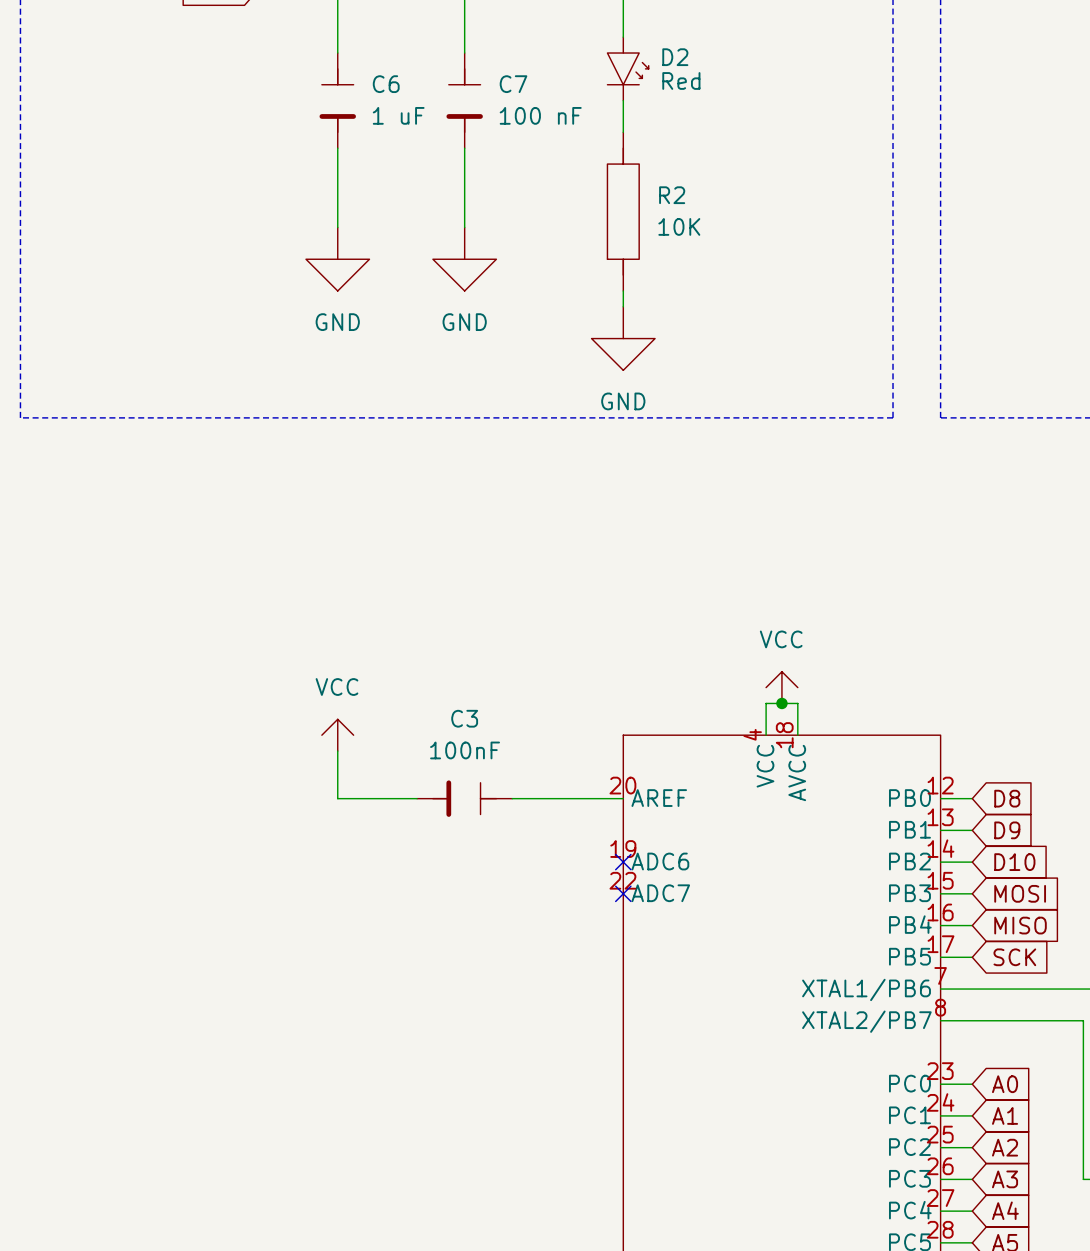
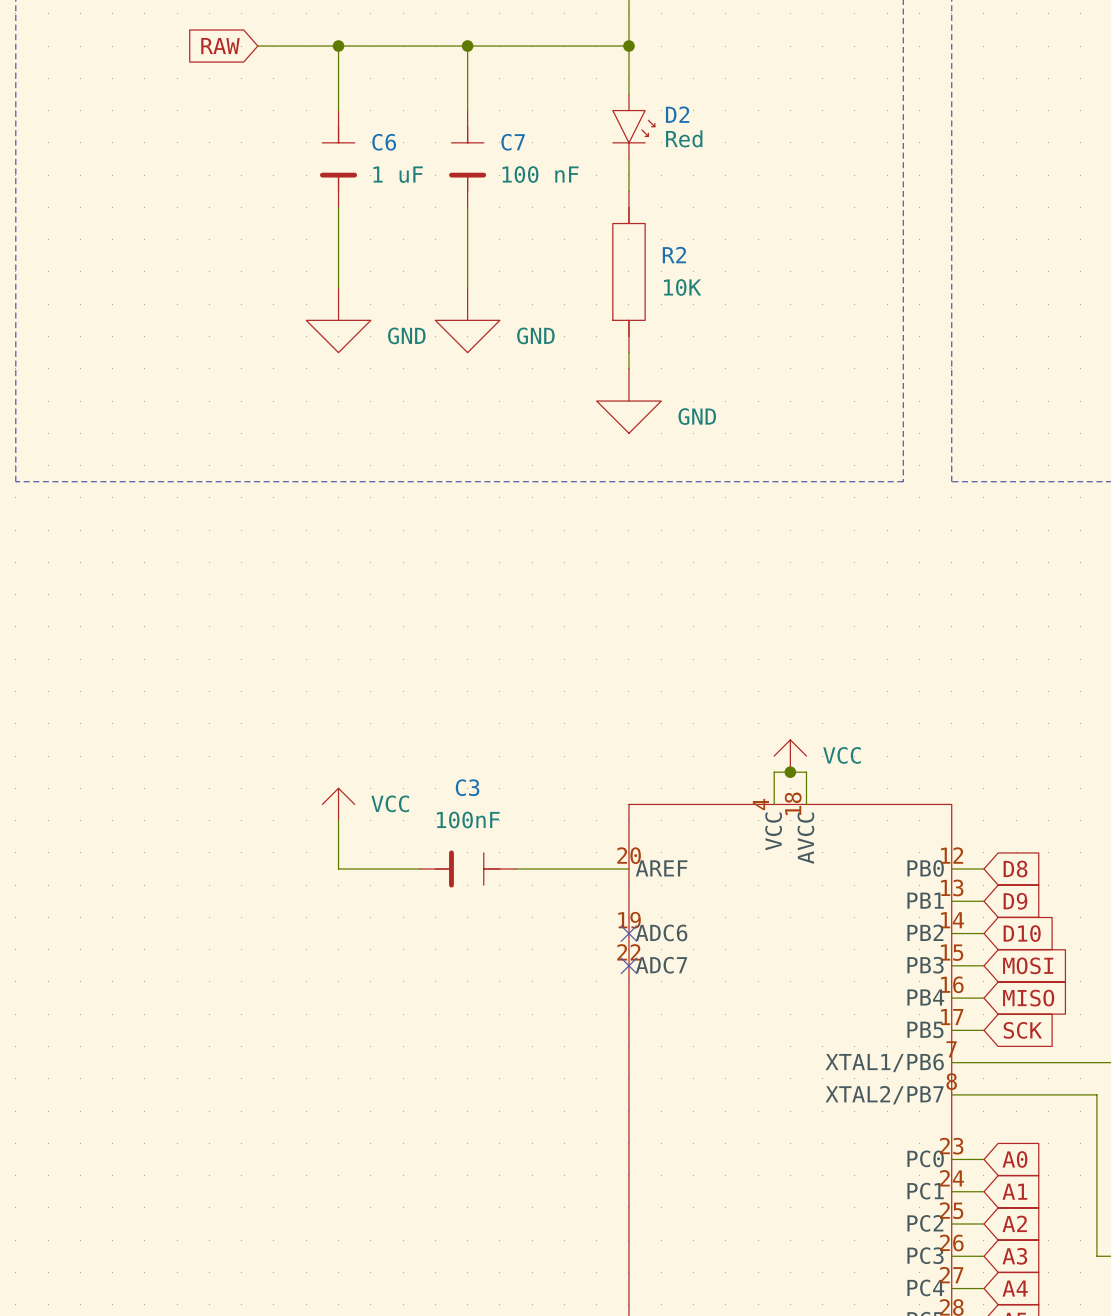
power symbol text position: GND (337, 322) -> GND (406, 335)
power symbol text position: GND (464, 322) -> GND (535, 335)
power symbol text position: GND (623, 401) -> GND (697, 416)
power symbol text position: VCC (781, 639) -> VCC (842, 755)
power symbol text position: VCC (336, 687) -> VCC (390, 803)

